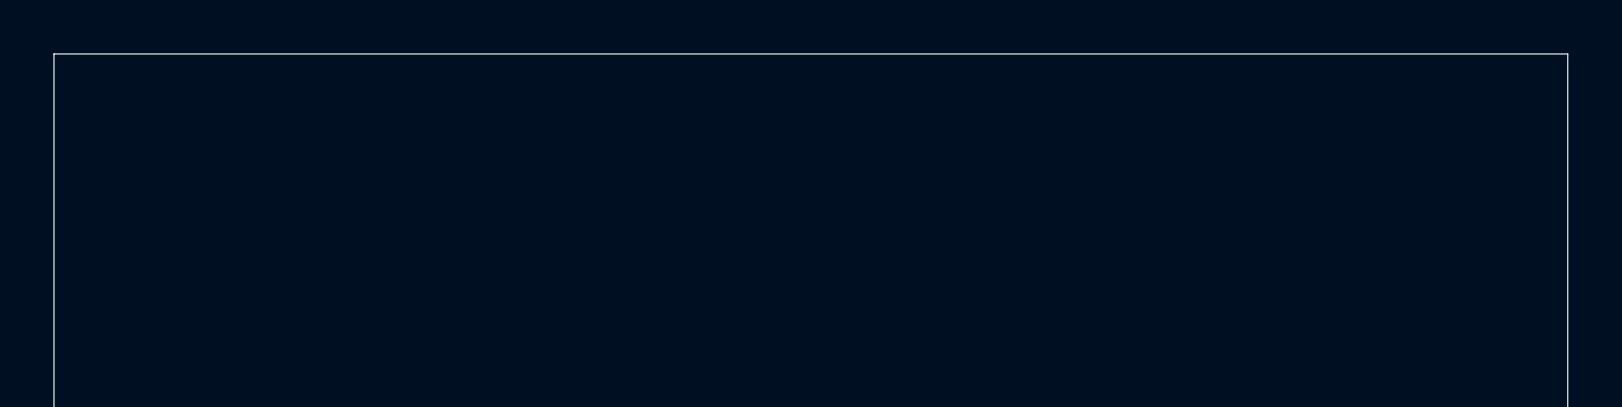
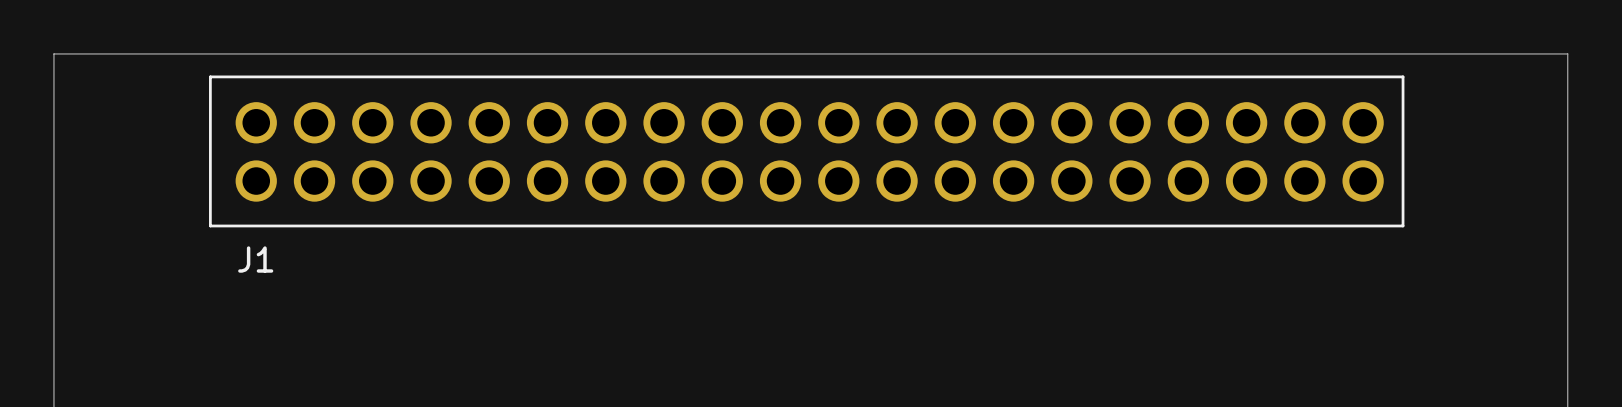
J1: none -> (806, 151)

